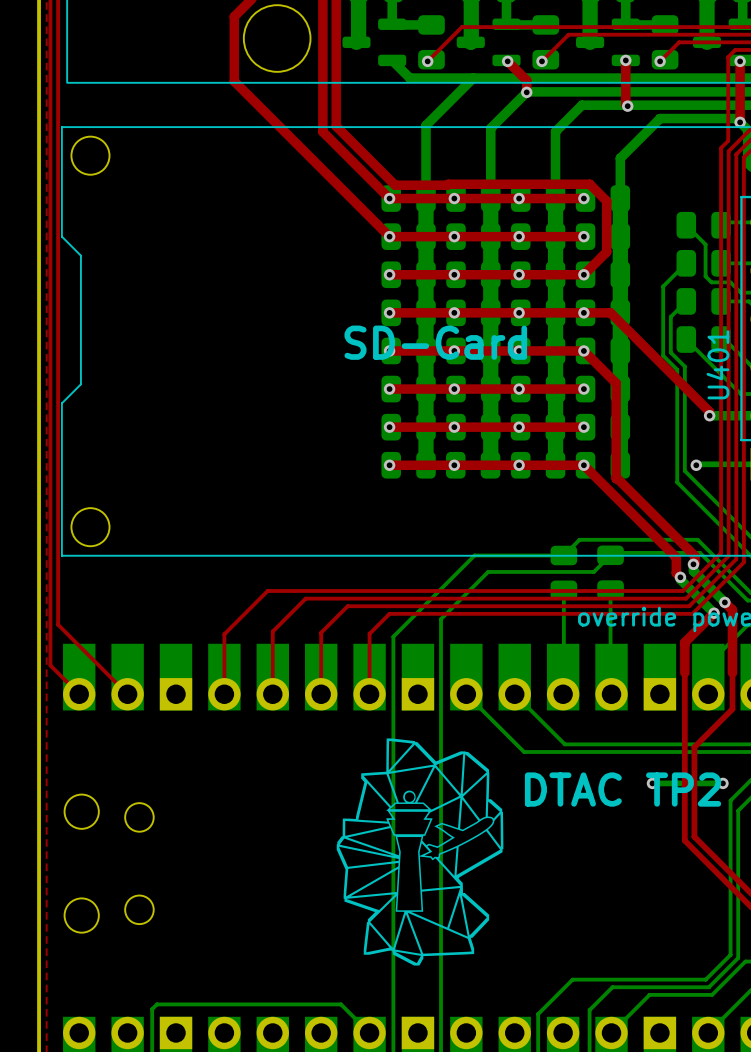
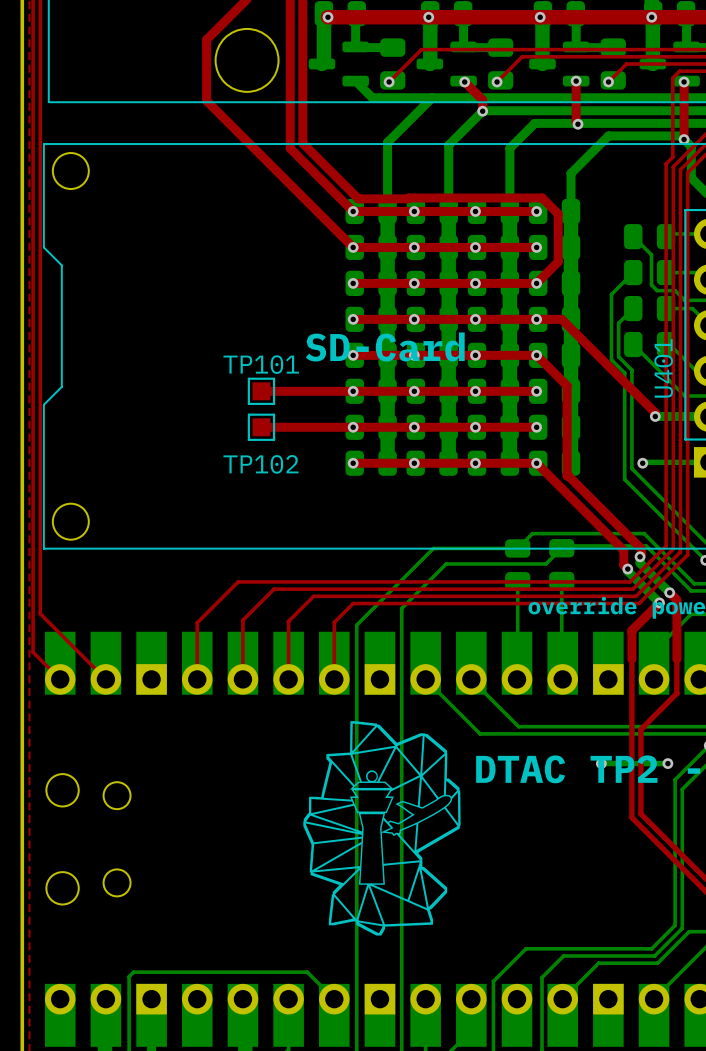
top track: none -> (261, 391) (353, 391)
TP101: none -> (261, 391)
top track: none -> (261, 427) (353, 427)
TP102: none -> (261, 427)

